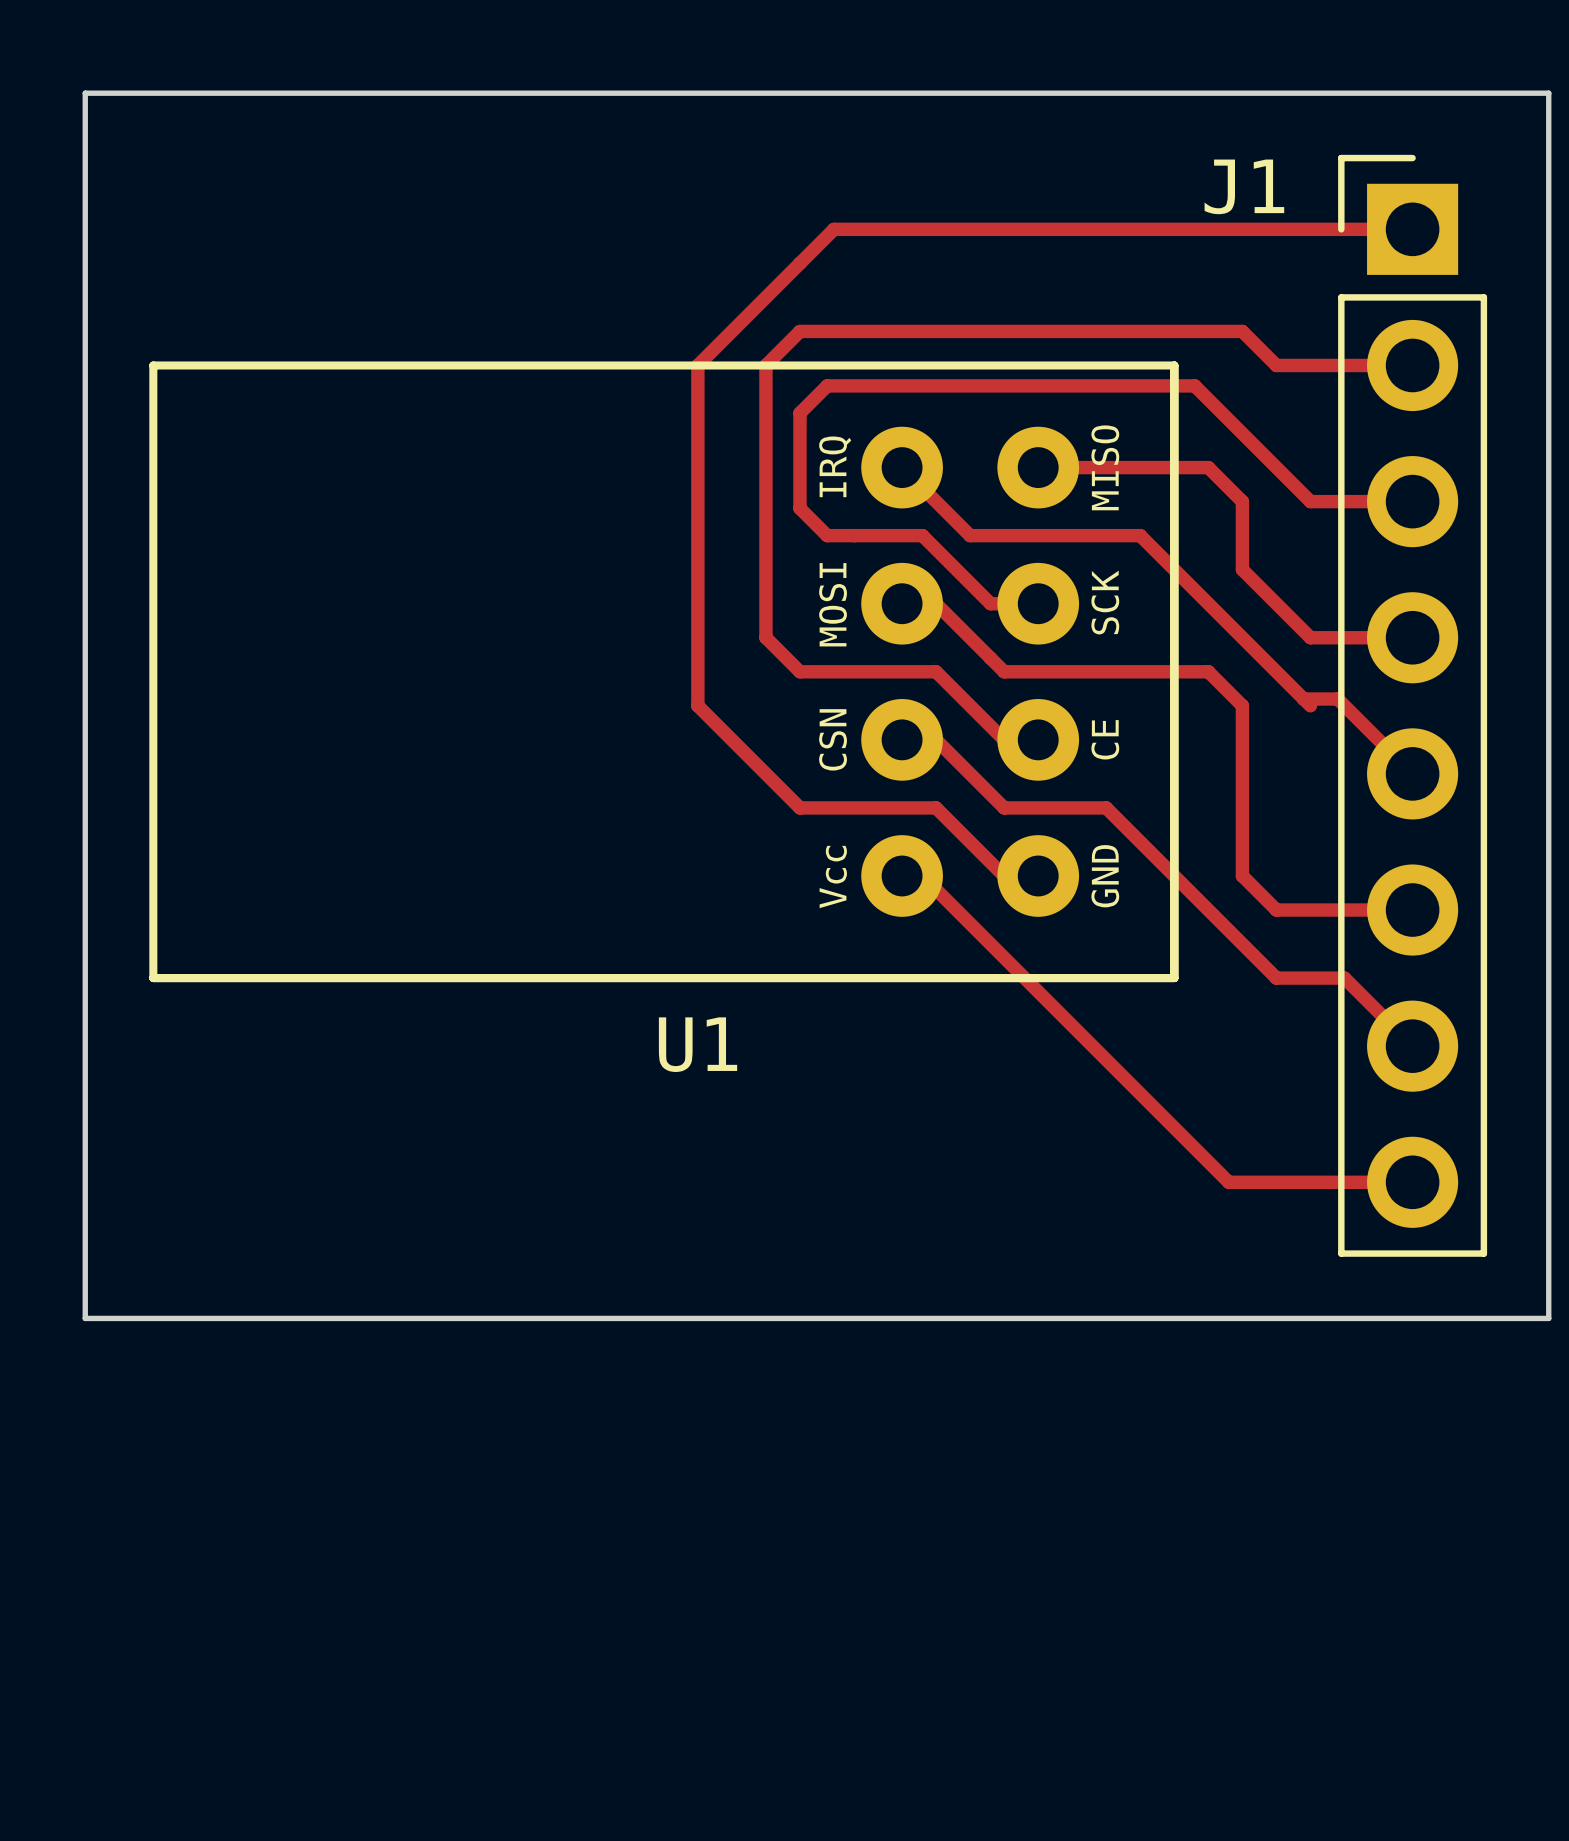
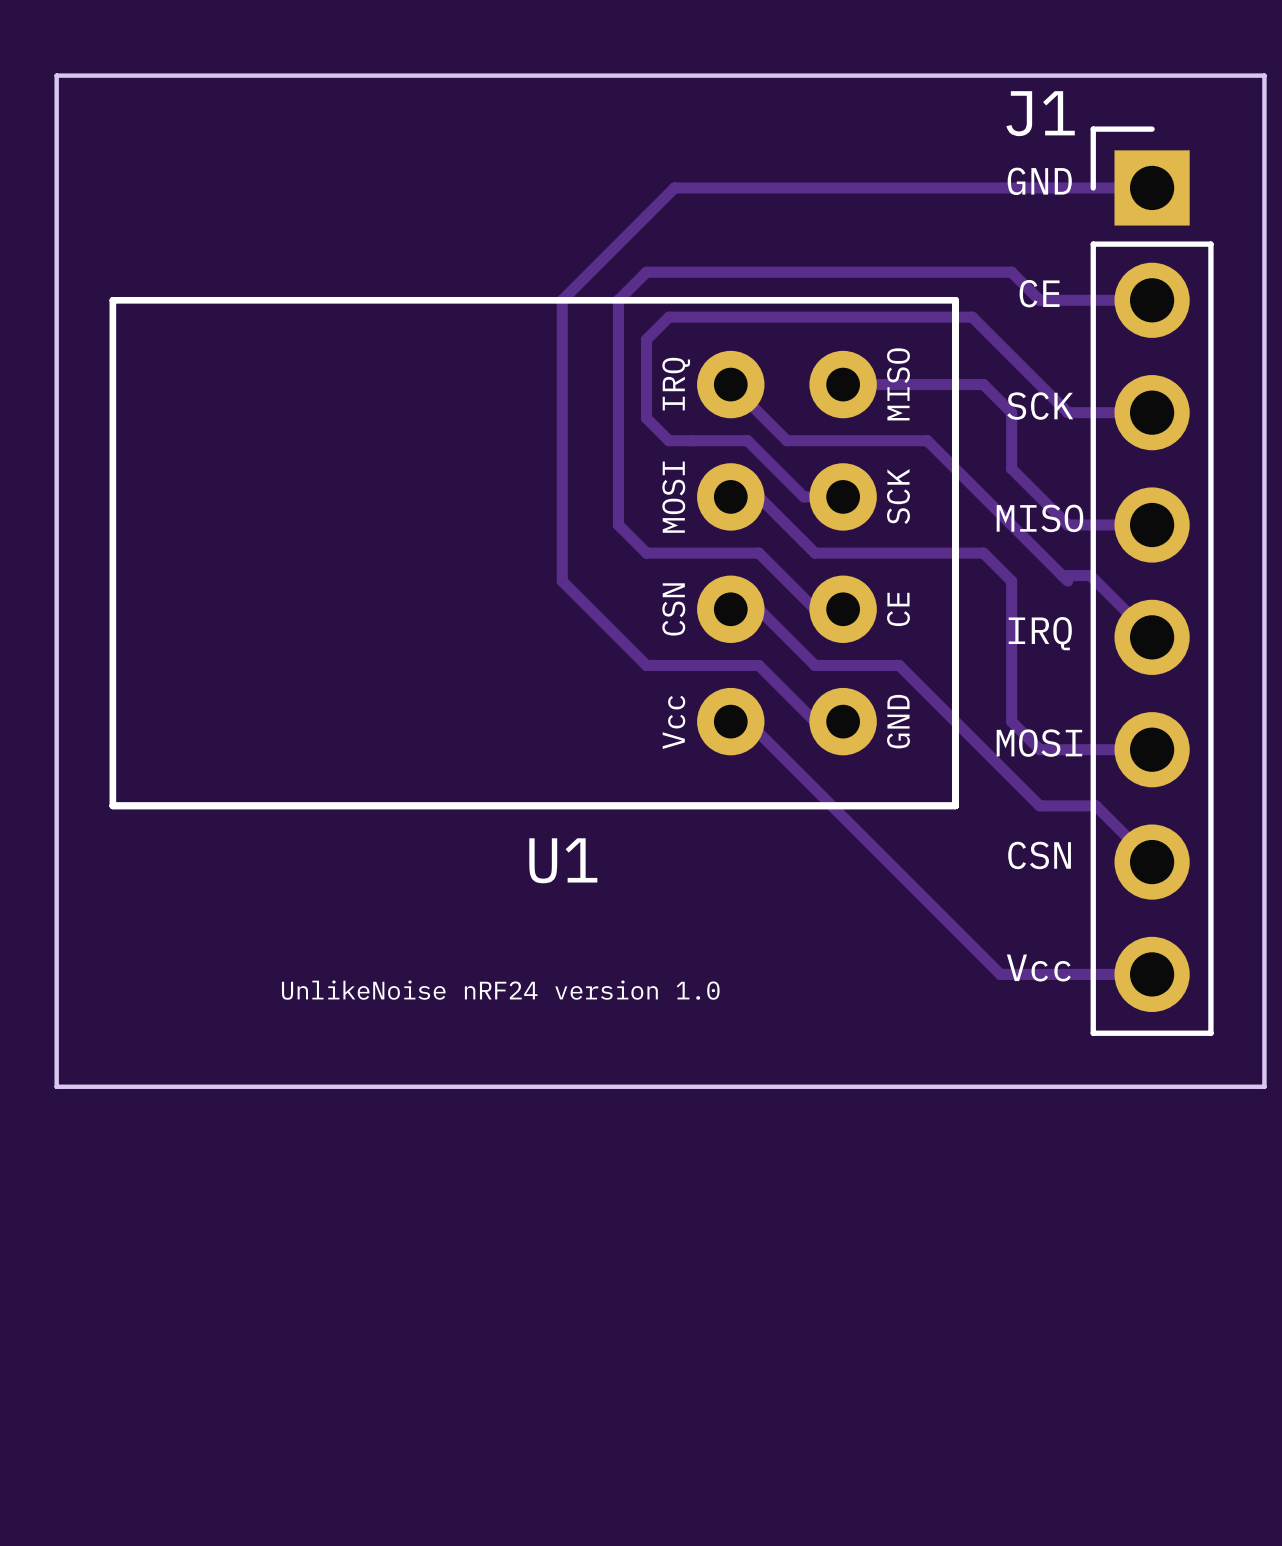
J1 name position: J1 (1244, 186) -> J1 (1040, 113)
text: none -> GND (1039, 181)
text: none -> CE (1039, 293)
text: none -> SCK (1040, 406)
text: none -> MISO (1039, 518)
text: none -> IRQ (1040, 633)
text: none -> MOSI (1039, 743)
text: none -> CSN (1039, 855)
text: none -> Vcc (1038, 968)
text: none -> UnlikeNoise nRF24 version 1.0 (500, 990)

